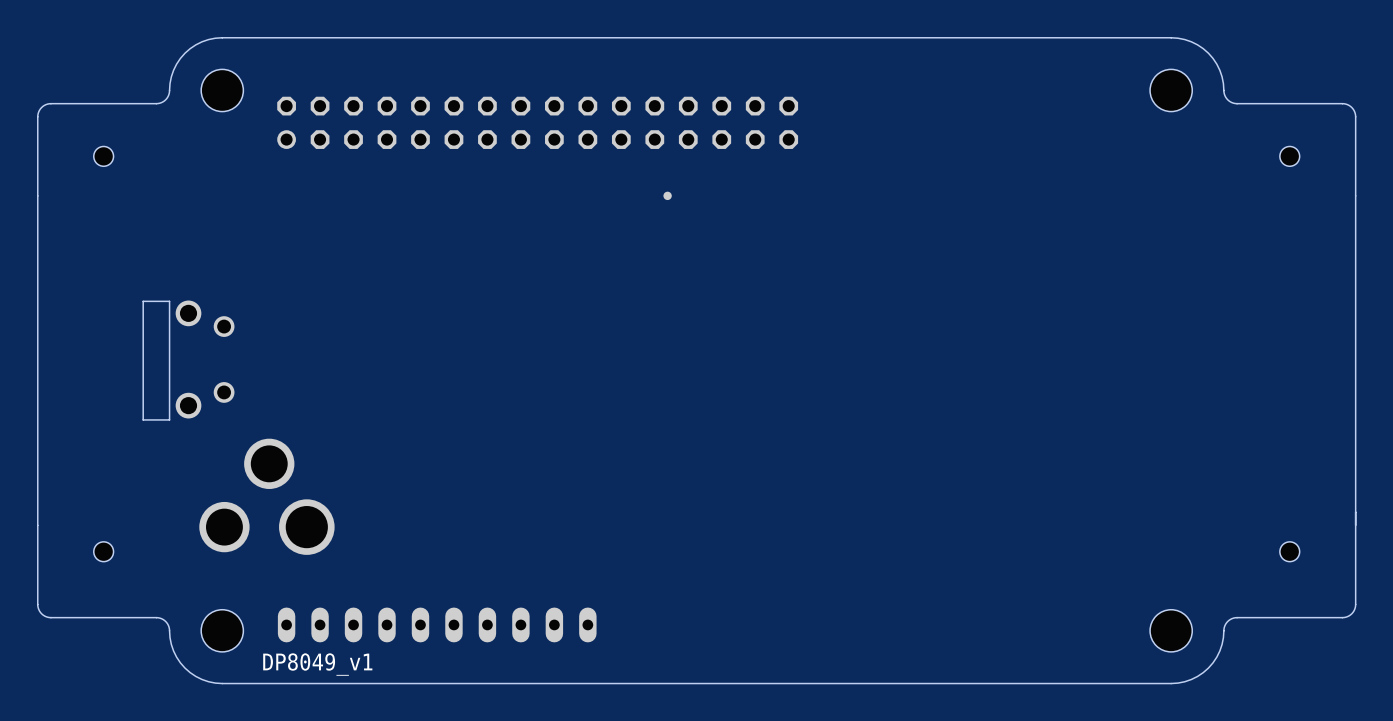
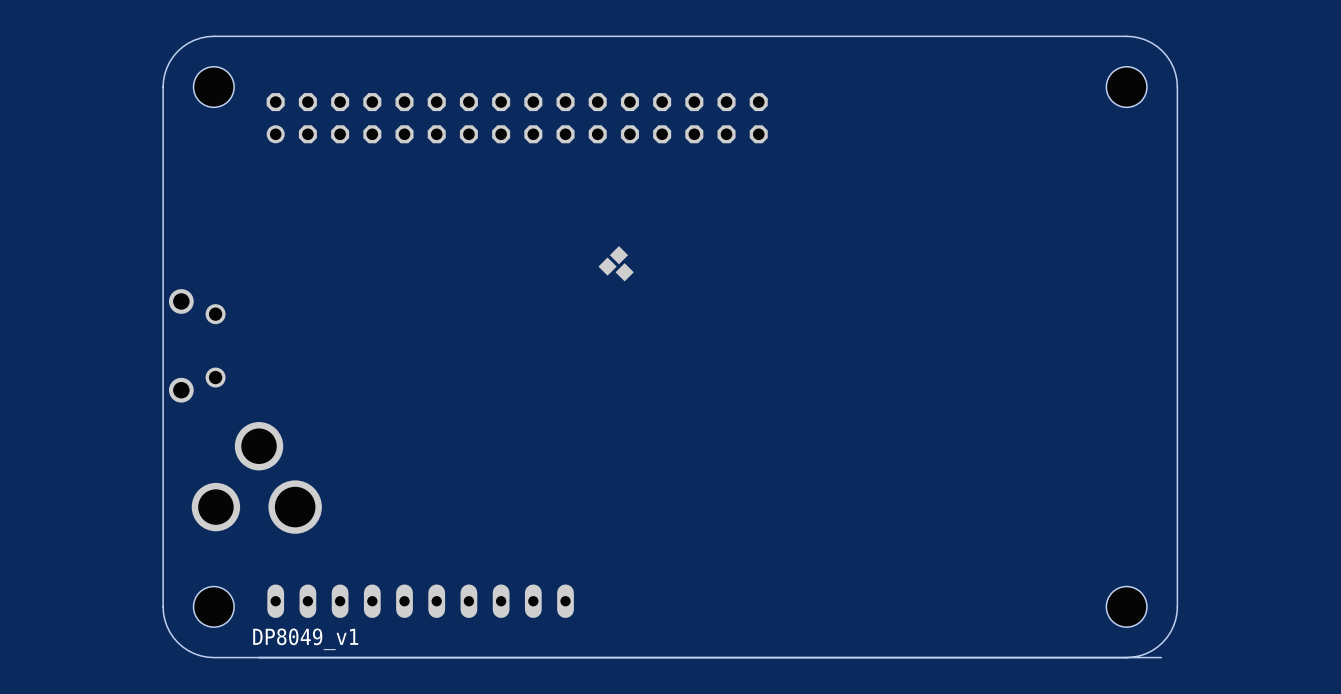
hole: (103, 156) -> none
hole: (1289, 156) -> none
part: (667, 195) -> none
part: none -> (616, 263)
board edge: (169, 301) (143, 301) (143, 419) (169, 419) (169, 301) -> none
part: none -> (670, 346)
hole: (103, 551) -> none
hole: (1289, 551) -> none
board edge: (1171, 683) (1191, 679) (1208, 668) (1219, 650) (1224, 625) (1232, 618) (1344, 617) (1350, 614) (1355, 607) (1355, 116) (1350, 106) (1342, 103) (1232, 102) (1224, 95) (1219, 70) (1208, 53) (1191, 41) (1171, 37) (215, 38) (195, 44) (180, 58) (171, 76) (168, 95) (161, 102) (49, 103) (42, 106) (38, 113) (37, 606) (41, 613) (49, 617) (159, 618) (168, 625) (171, 644) (176, 657) (185, 668) (195, 676) (215, 683) (268, 683) -> (1126, 657) (1161, 657)

